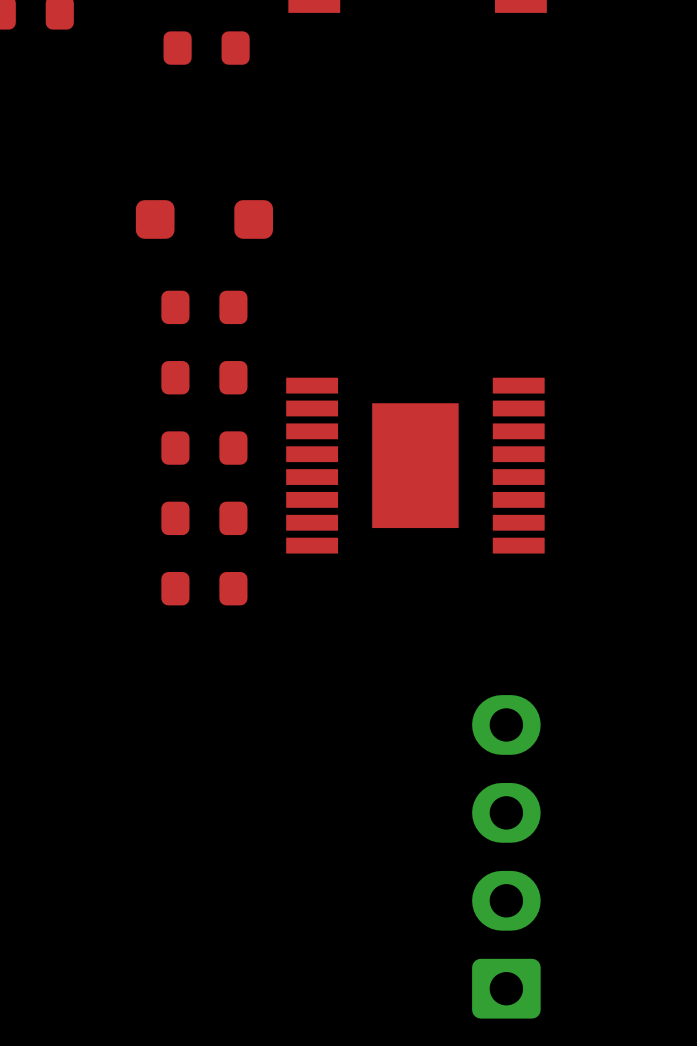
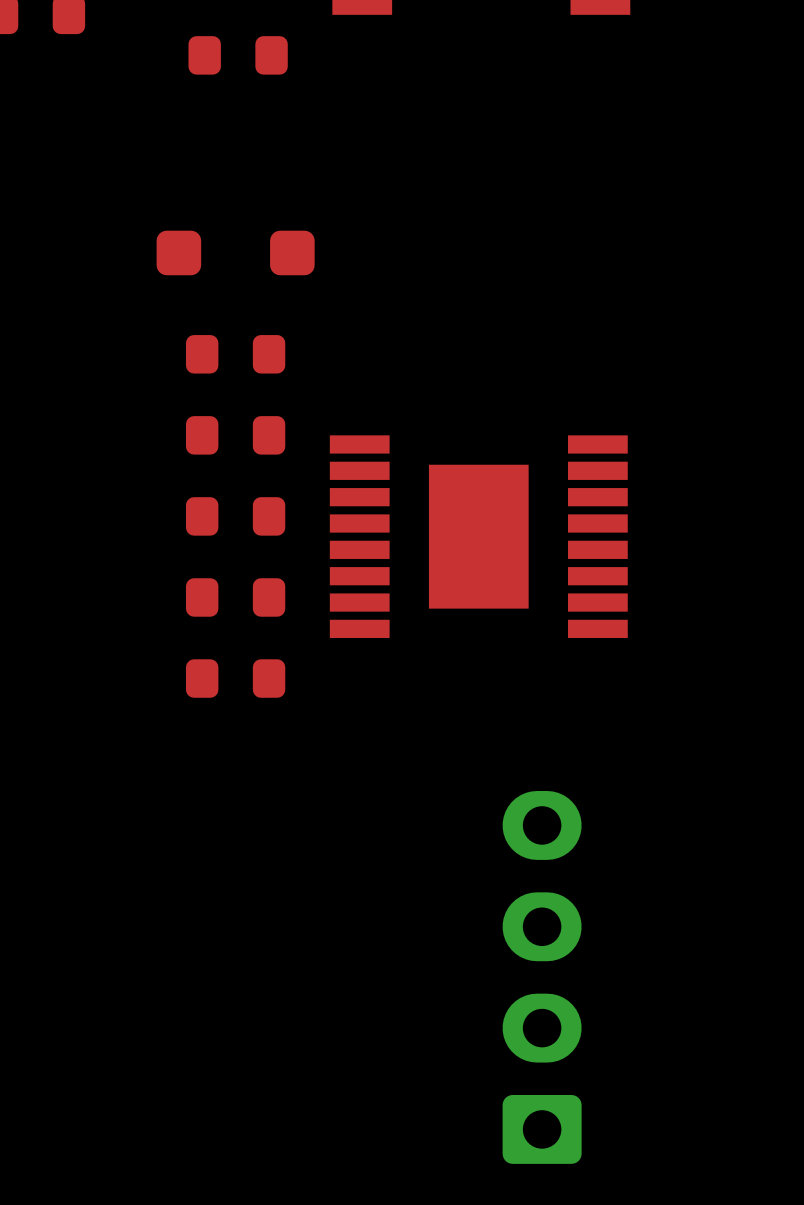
part position: (506, 856) -> (542, 977)

